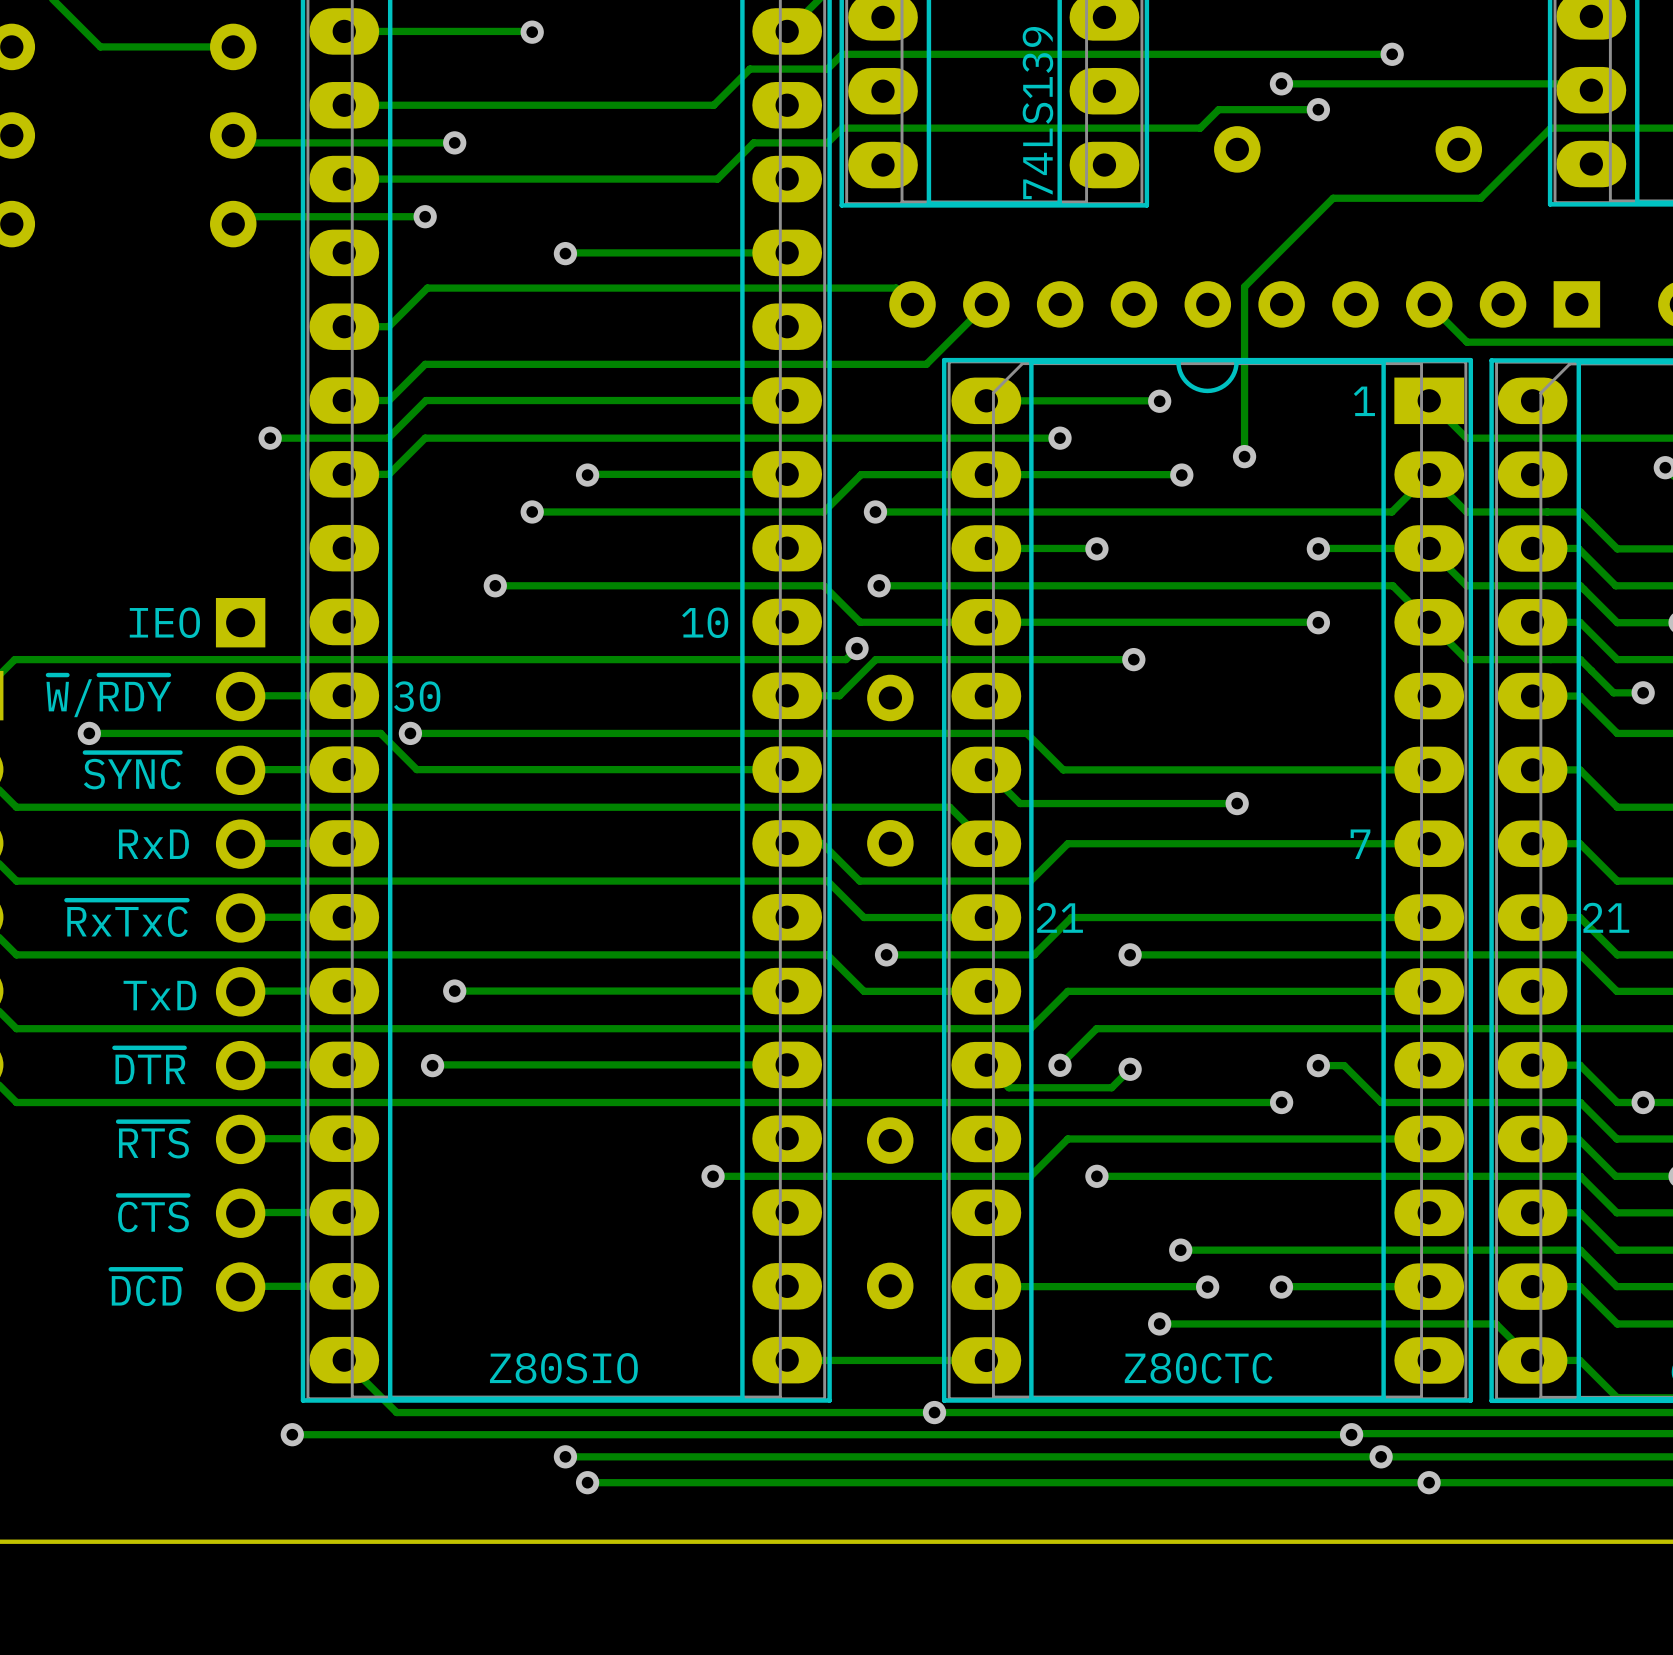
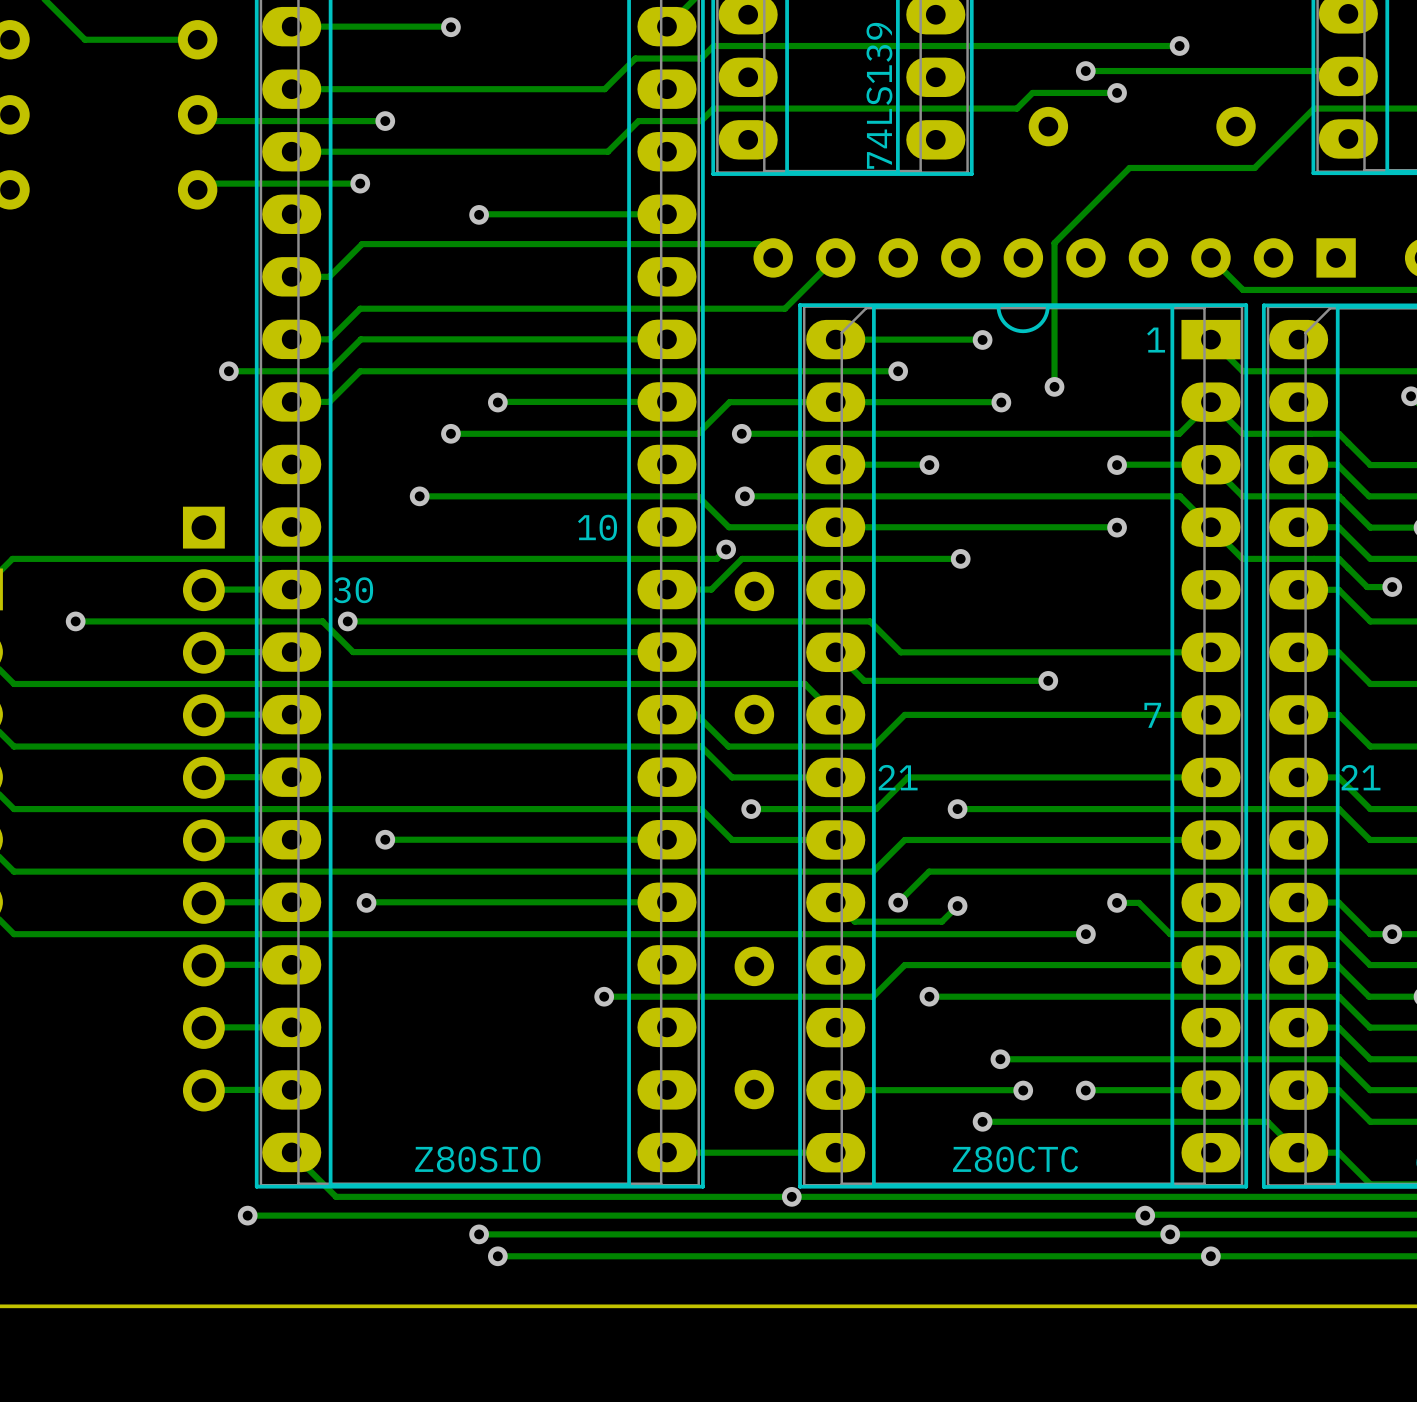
text: IEO (164, 622) -> none
text: ~{W}/~{RDY} (108, 696) -> none
text: ~{SYNC} (132, 770) -> none
text: RxD (153, 844) -> none
text: ~{RxTxC} (127, 918) -> none
text: TxD (159, 995) -> none
text: ~{DTR} (149, 1065) -> none
text: ~{RTS} (153, 1140) -> none
text: ~{CTS} (153, 1213) -> none
text: ~{DCD} (146, 1287) -> none

